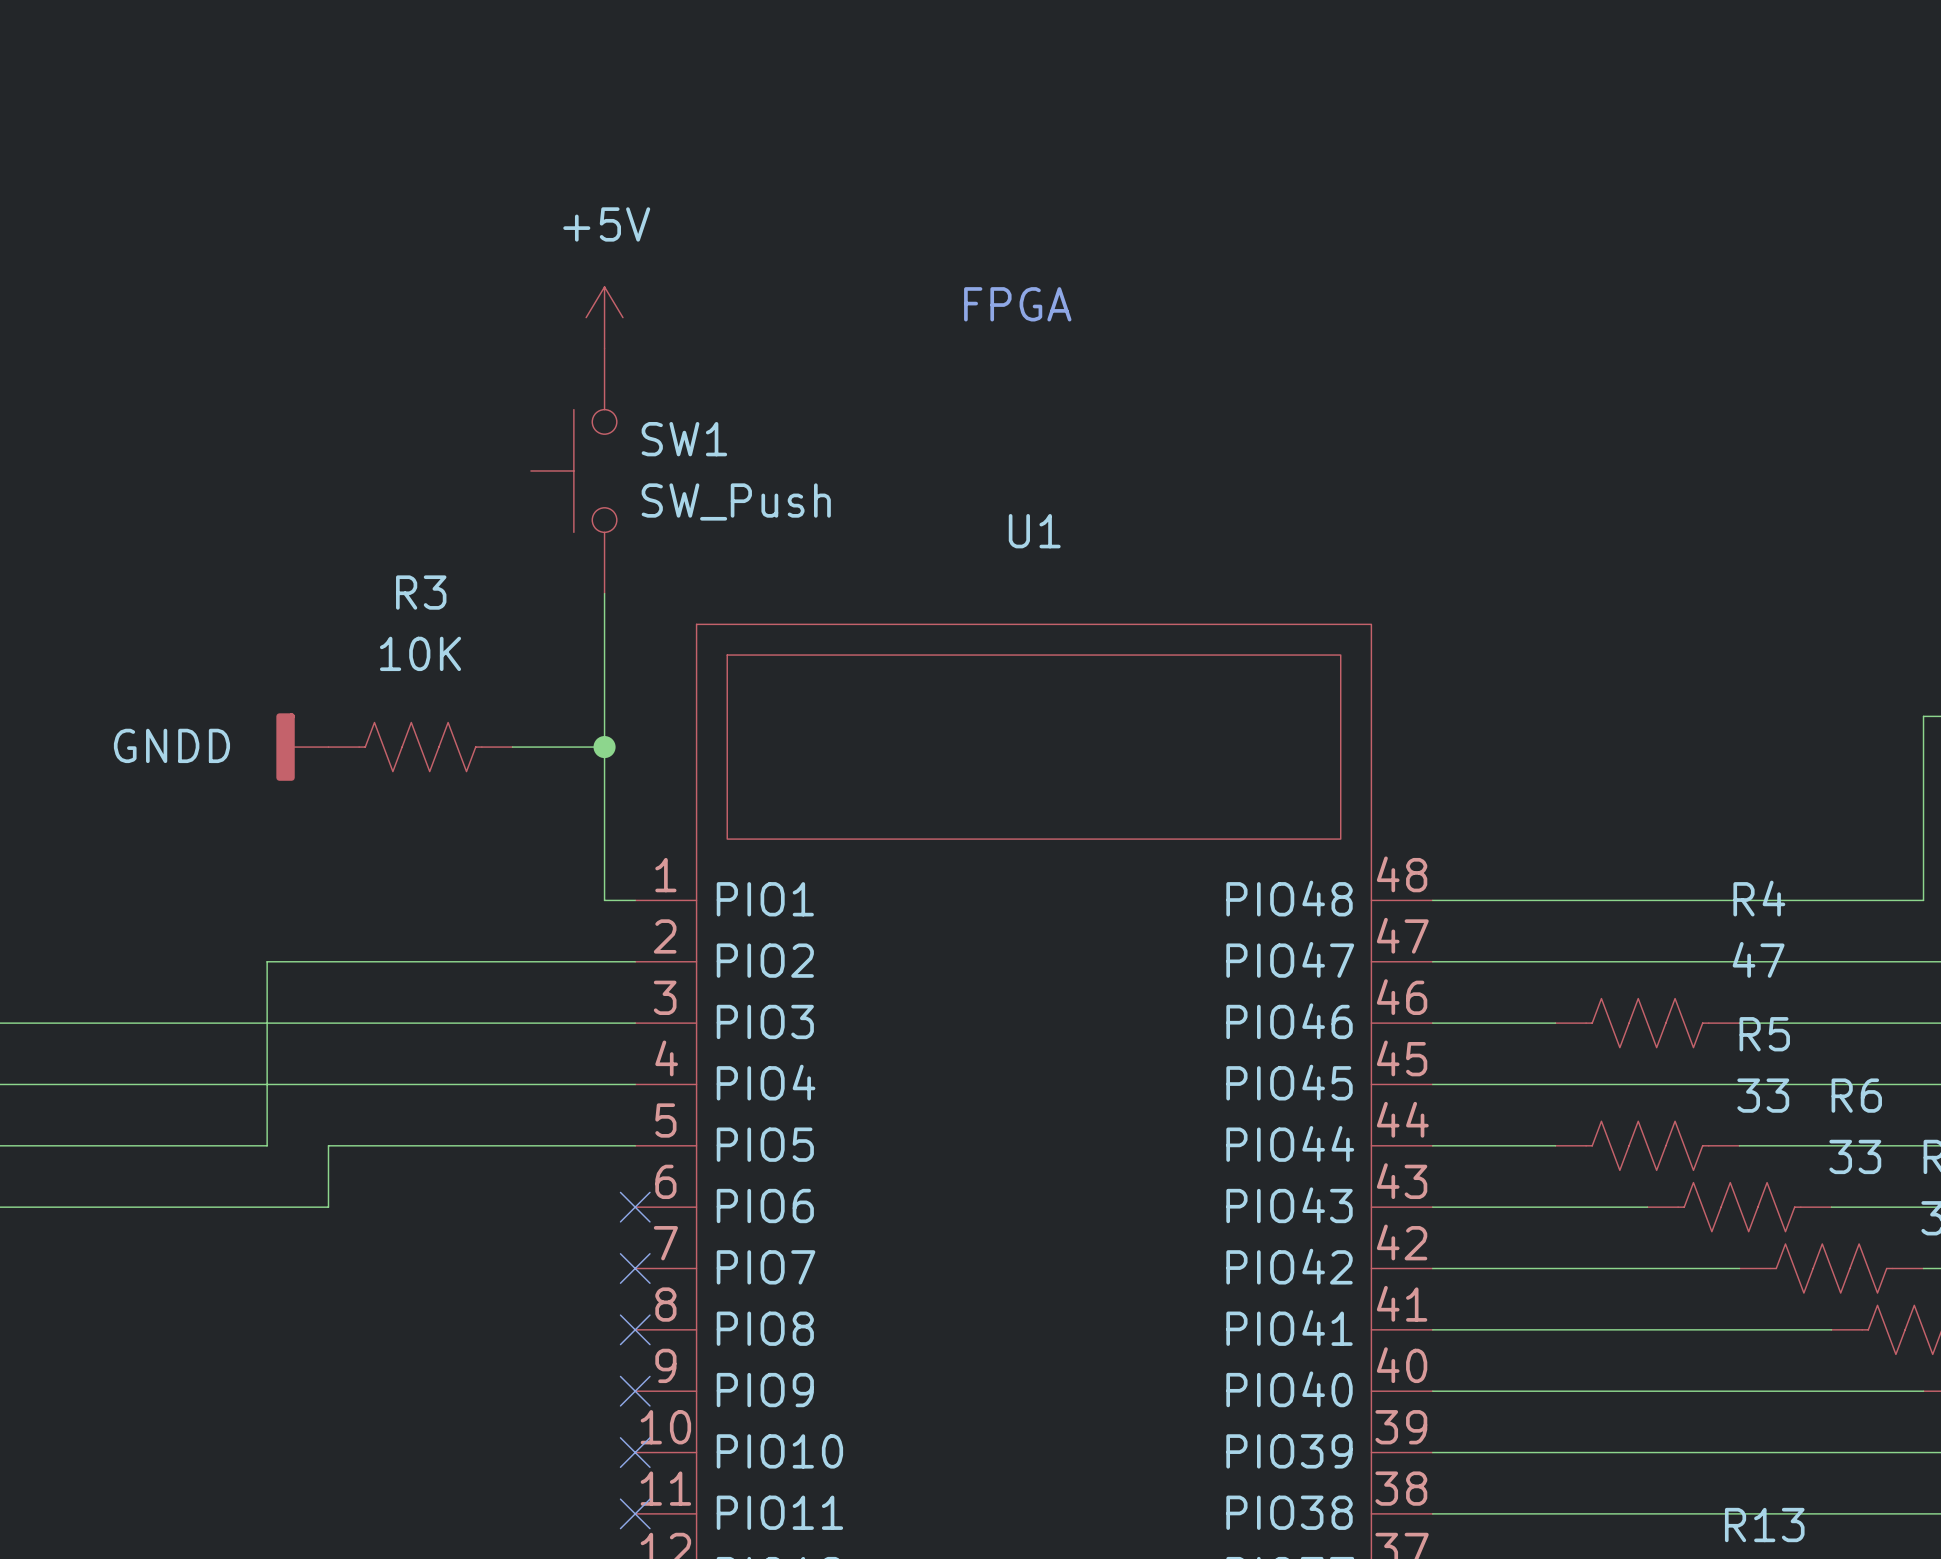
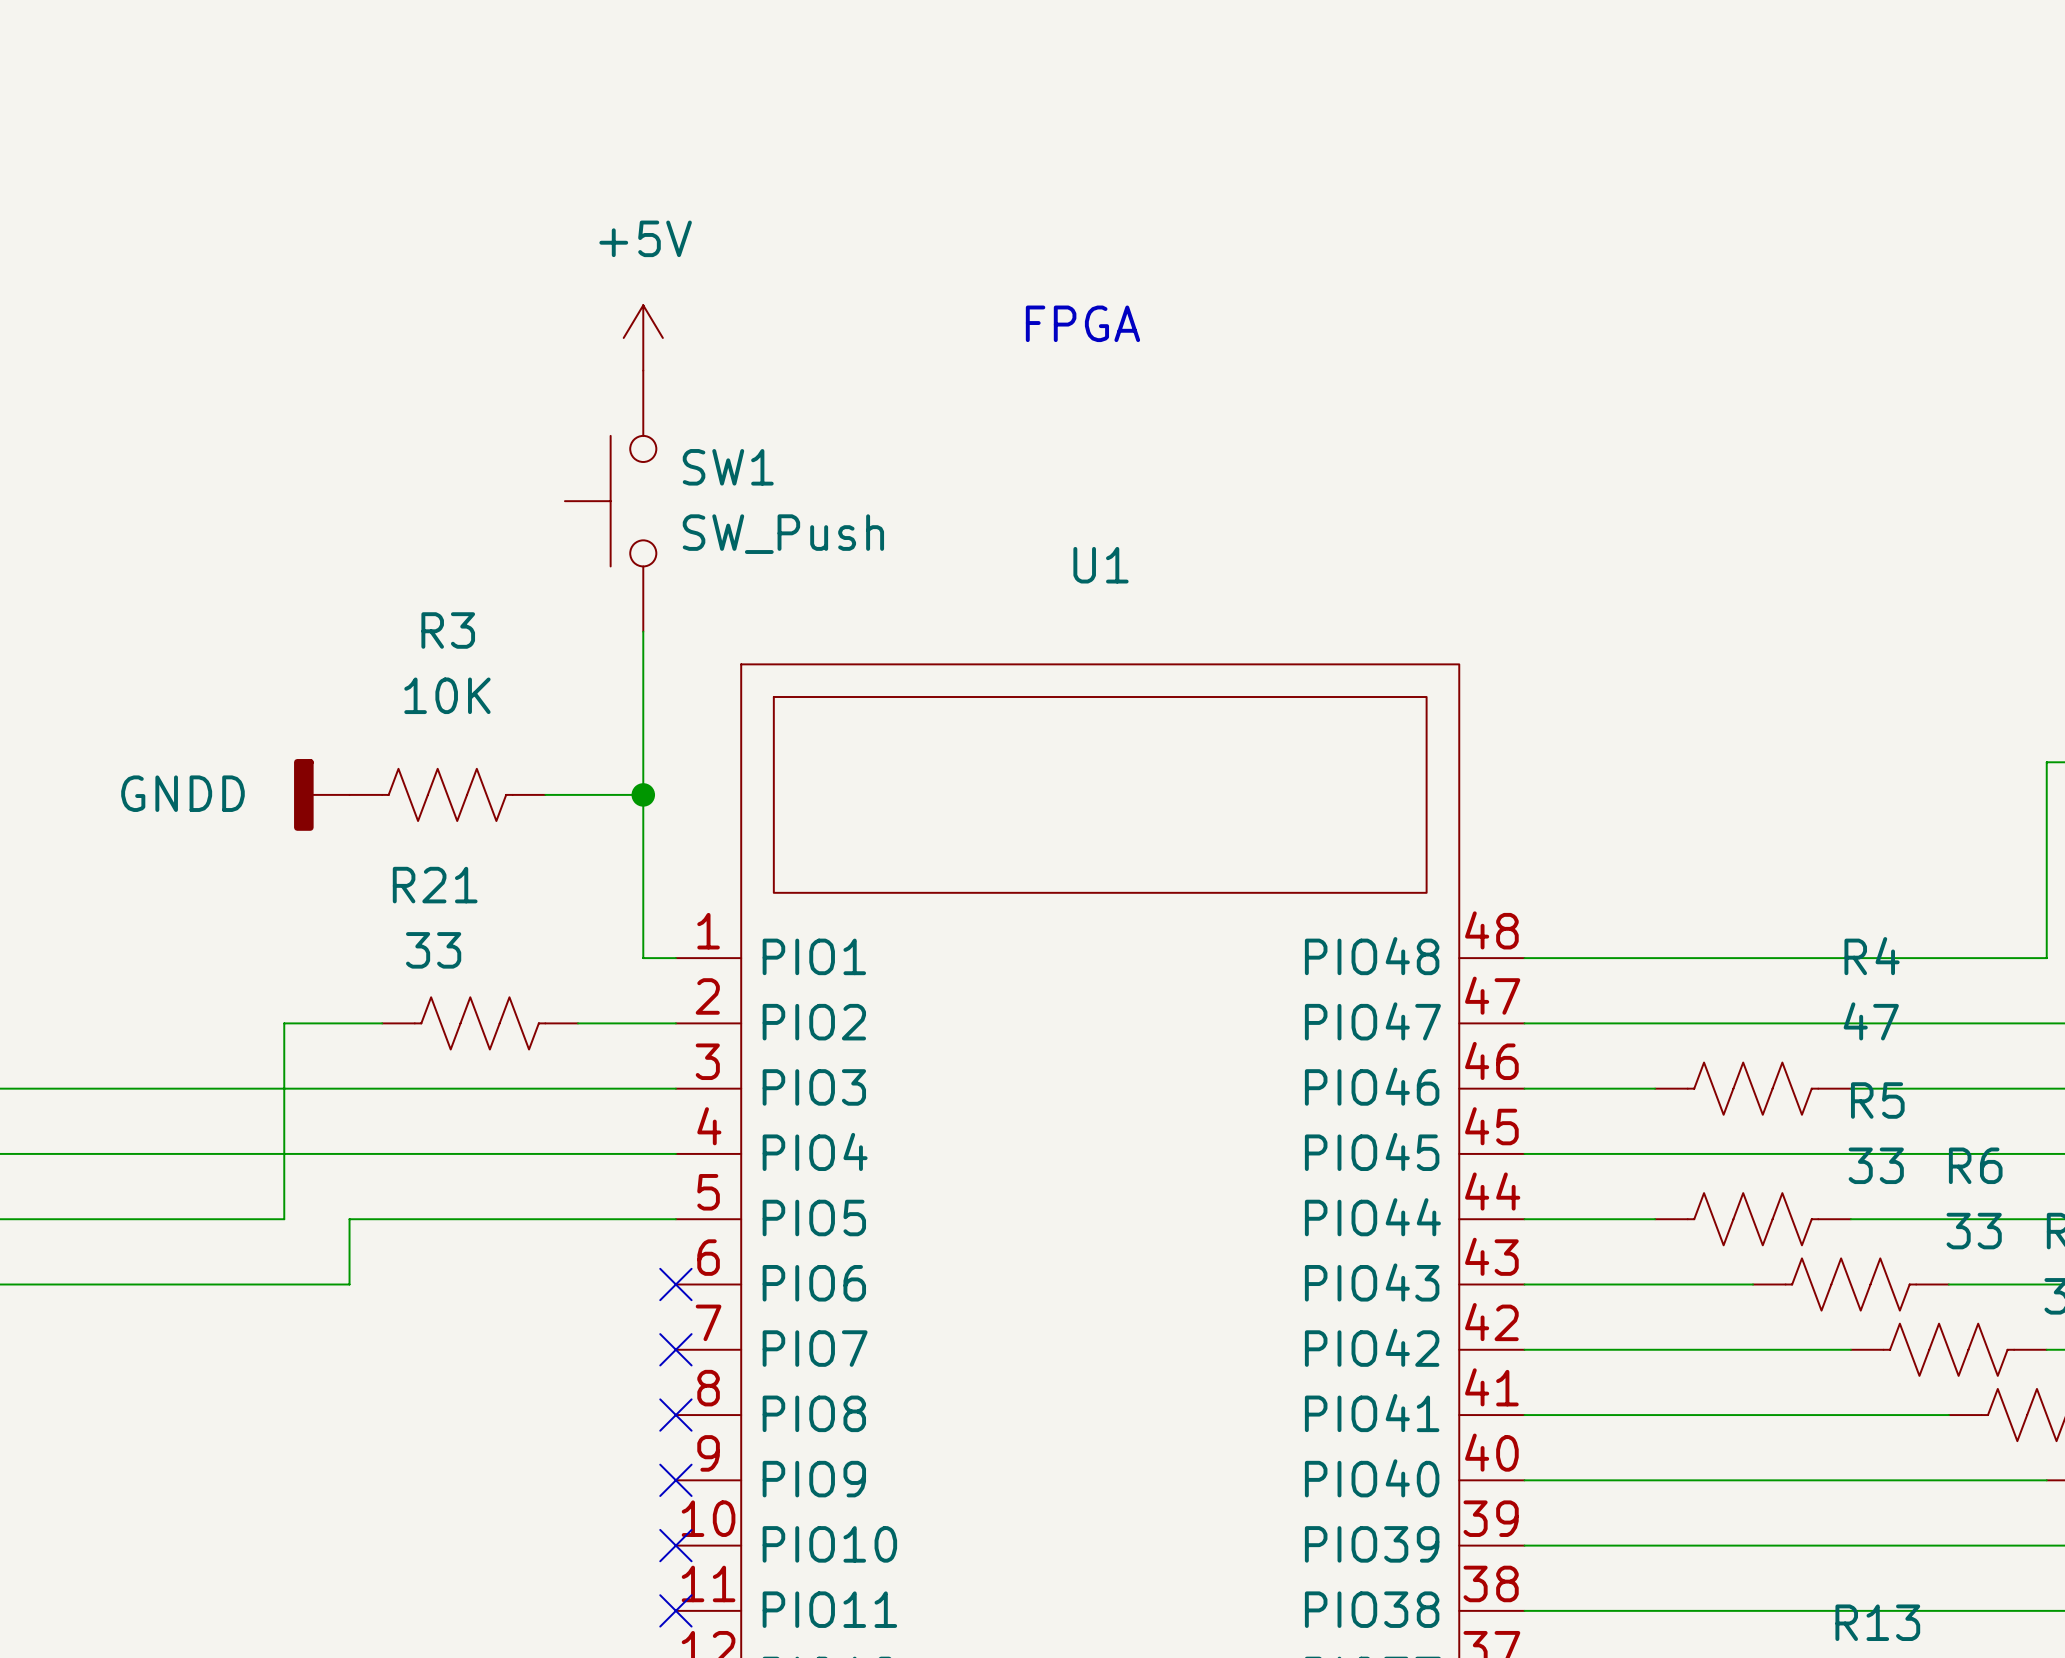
wire: (359, 961) (543, 961) -> none
R21: none -> 33 (480, 1023)

